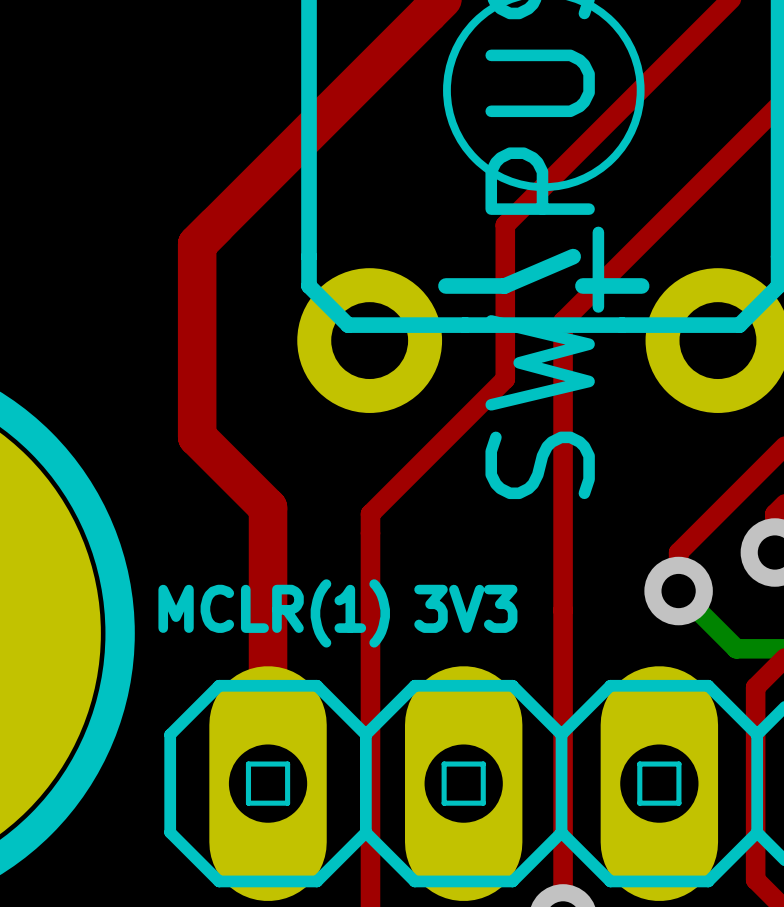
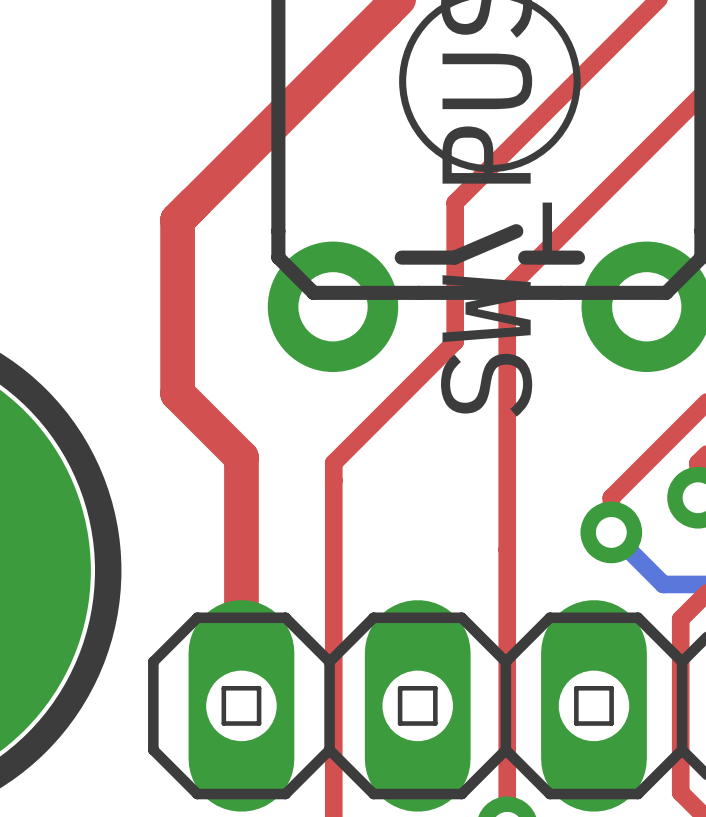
text: 3V3 (465, 608) -> none
text: MCLR(1) (274, 613) -> none

